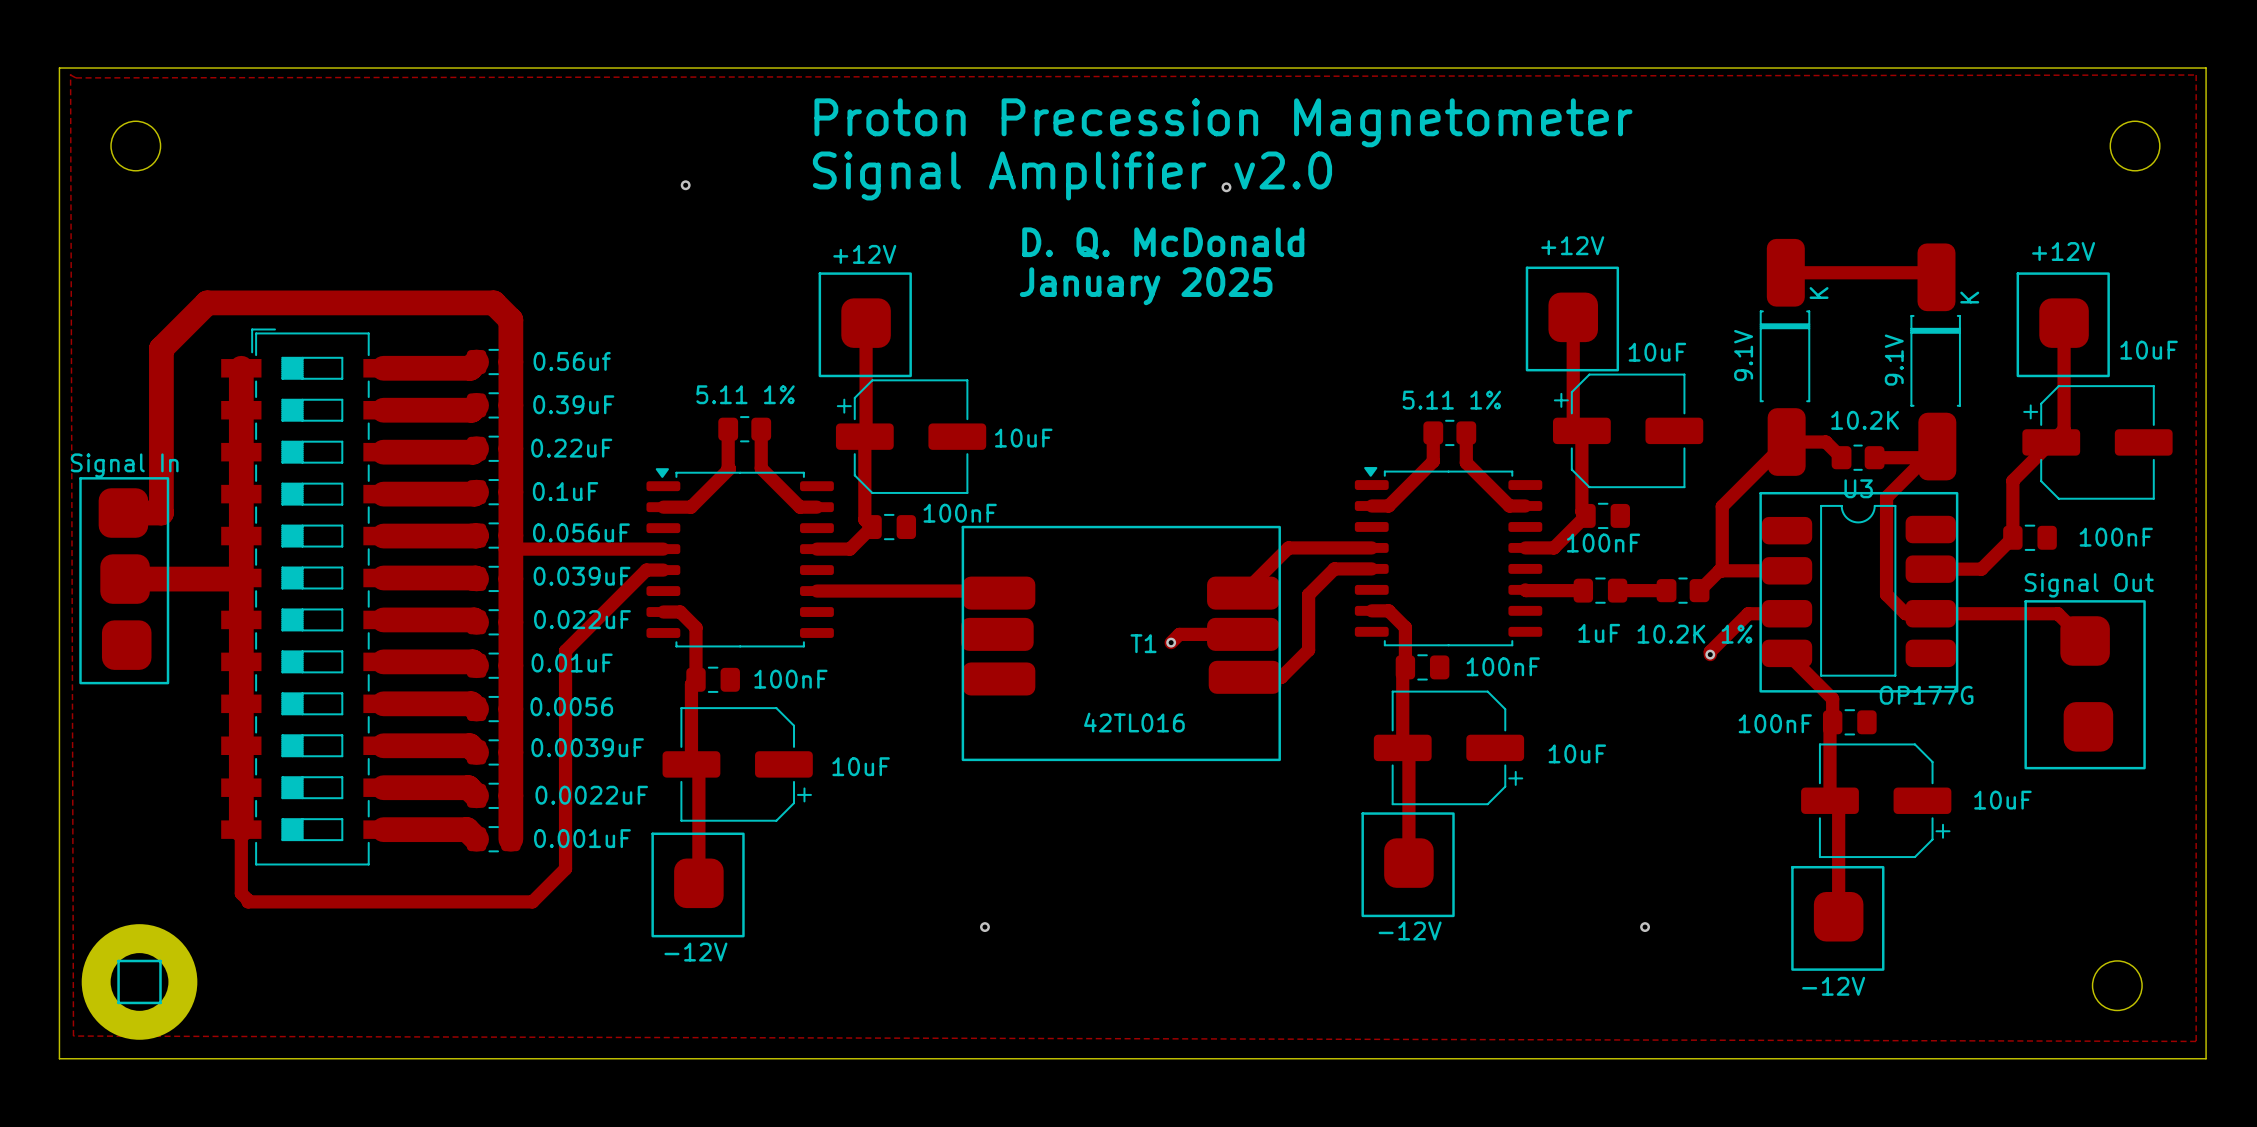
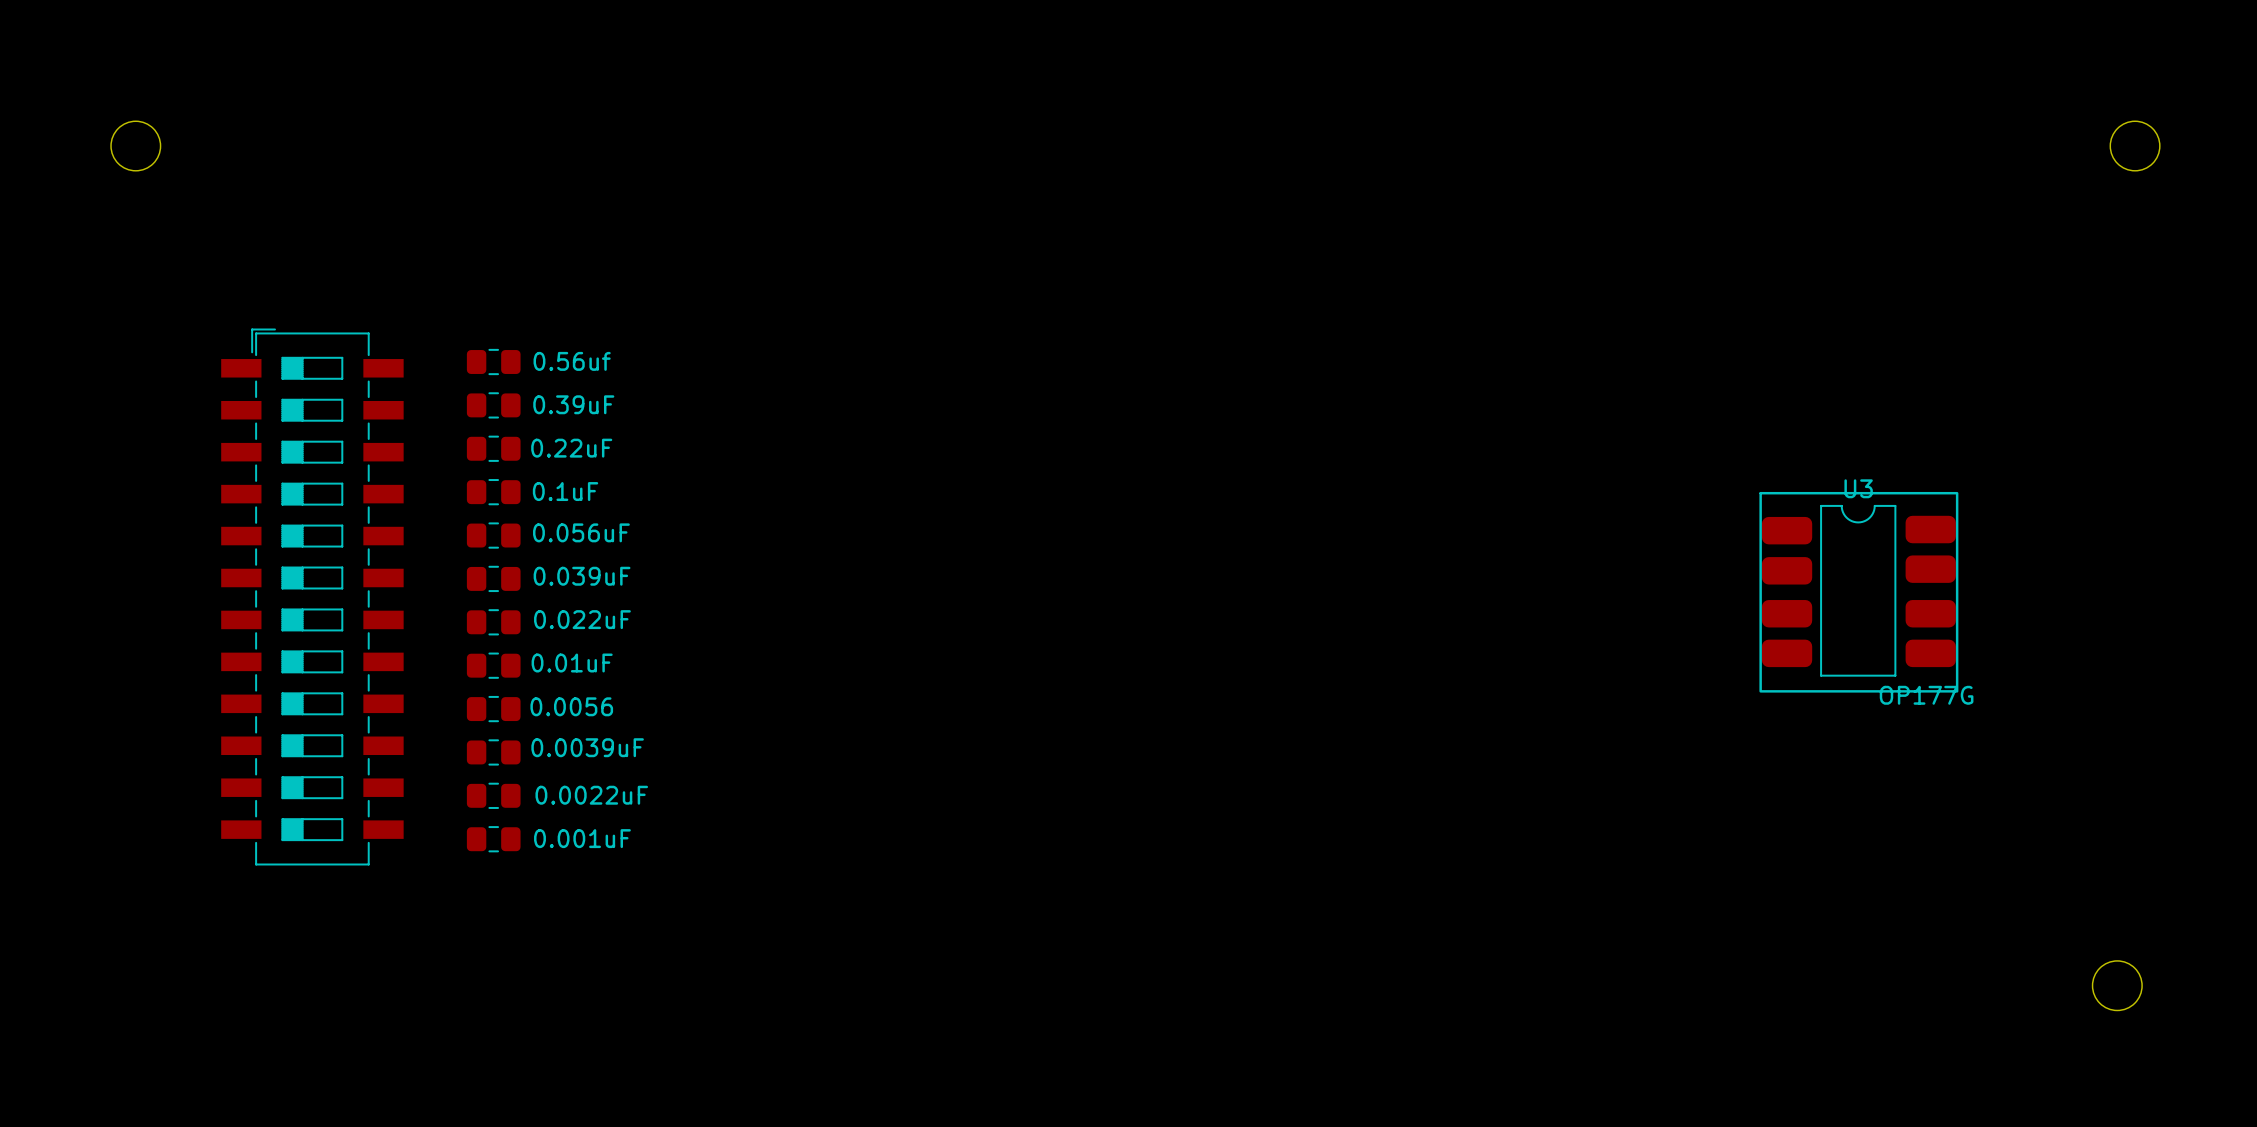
board edge: (59, 68) (2206, 68) (2206, 1058) (59, 1058) (59, 68) -> none
zone outline: (70, 74) (73, 1036) (2196, 1041) (2196, 75) (75, 77) (70, 74) -> none
text: Proton Precession Magnetometer (1223, 122) -> none
text: Signal Amplifier v2.0 (1072, 175) -> none
via: (685, 185) -> none
via: (1226, 187) -> none
text: D. Q. McDonald (1163, 243) -> none
track: (1785, 272) (1931, 272) (1936, 277) -> none
text: January 2025 (1146, 286) -> none
track: (1573, 317) (1573, 422) (1581, 430) (1581, 511) (1586, 515) (1553, 547) (1525, 547) -> none
part: +12V (1572, 319) -> none
track: (866, 323) (864, 519) (872, 527) (850, 549) (816, 549) -> none
track: (2064, 323) (2064, 429) (2012, 480) (2012, 537) (1981, 569) (1930, 569) -> none
part: +12V (865, 324) -> none
part: +12V (2063, 324) -> none
part: 9.1V (1785, 357) -> none
part: 9.1V (1935, 361) -> none
track: (476, 362) (470, 368) (383, 368) -> none
track: (241, 368) (241, 893) (248, 901) (532, 901) (565, 868) (565, 650) (646, 570) (663, 570) -> none
track: (476, 405) (471, 410) (383, 410) -> none
track: (728, 429) (729, 468) (691, 507) (663, 507) -> none
part: 5.11 1% (744, 429) -> none
track: (761, 429) (761, 468) (800, 507) (816, 507) -> none
part: 10uF (1628, 430) -> none
track: (1433, 432) (1433, 461) (1388, 506) (1371, 506) -> none
part: 5.11 1% (1449, 432) -> none
track: (1466, 432) (1466, 462) (1509, 506) (1525, 506) -> none
part: 10uF (911, 436) -> none
part: 10uF (2097, 442) -> none
track: (1937, 446) (1886, 497) (1886, 594) (1905, 613) (2057, 613) (2085, 640) -> none
track: (476, 448) (473, 452) (383, 452) -> none
track: (1841, 457) (1825, 442) (1786, 442) (1722, 506) (1722, 570) -> none
part: 10.2K (1858, 457) -> none
track: (1874, 457) (1926, 457) -> none
track: (476, 492) (474, 494) (383, 494) -> none
track: (123, 513) (161, 513) (161, 348) (207, 302) (493, 302) (510, 320) (510, 839) -> none
part: 100nF (1603, 515) -> none
part: 100nF (889, 527) -> none
track: (476, 535) (383, 536) -> none
part: 100nF (2030, 537) -> none
track: (1371, 547) (1288, 547) (1243, 593) -> none
track: (510, 548) (663, 549) -> none
part: (1448, 556) -> none
part: (740, 557) -> none
track: (1371, 568) (1334, 568) (1308, 594) (1308, 650) (1281, 677) (1245, 677) -> none
track: (1787, 570) (1719, 570) (1699, 590) -> none
track: (241, 577) (125, 579) -> none
track: (383, 577) (476, 578) -> none
part: Signal In (124, 580) -> none
track: (1525, 589) (1583, 590) -> none
part: 1uF (1600, 590) -> none
track: (1617, 590) (1666, 590) -> none
part: 10.2K 1% (1683, 590) -> none
track: (816, 591) (987, 591) -> none
track: (1371, 610) (1388, 610) (1405, 627) (1405, 667) (1402, 670) (1402, 747) (1408, 754) (1408, 863) -> none
track: (663, 612) (680, 612) (696, 627) (696, 679) (691, 684) (691, 764) (698, 771) (698, 883) -> none
track: (1787, 613) (1748, 613) (1710, 651) (1710, 654) -> none
track: (383, 619) (474, 619) (476, 622) -> none
track: (1243, 634) (1179, 634) (1171, 642) -> none
via: (1171, 642) -> none
T1: 42TL016 (1121, 643) -> none
track: (1787, 653) (1832, 698) (1832, 722) (1829, 725) (1829, 800) (1838, 809) (1838, 916) -> none
via: (1710, 654) -> none
track: (383, 661) (472, 661) (476, 665) -> none
part: 100nF (1422, 667) -> none
part: 100nF (713, 679) -> none
part: Signal Out (2085, 684) -> none
track: (383, 703) (471, 703) (476, 709) -> none
part: 100nF (1849, 722) -> none
track: (383, 745) (469, 745) (476, 752) -> none
part: 10uF (1448, 747) -> none
part: 10uF (737, 764) -> none
track: (383, 787) (468, 787) (476, 795) -> none
part: 10uF (1876, 800) -> none
track: (383, 829) (467, 829) (476, 839) -> none
part: -12V (1408, 864) -> none
part: -12V (698, 884) -> none
part: -12V (1837, 918) -> none
via: (984, 927) -> none
via: (1645, 927) -> none
part: (139, 981) -> none

